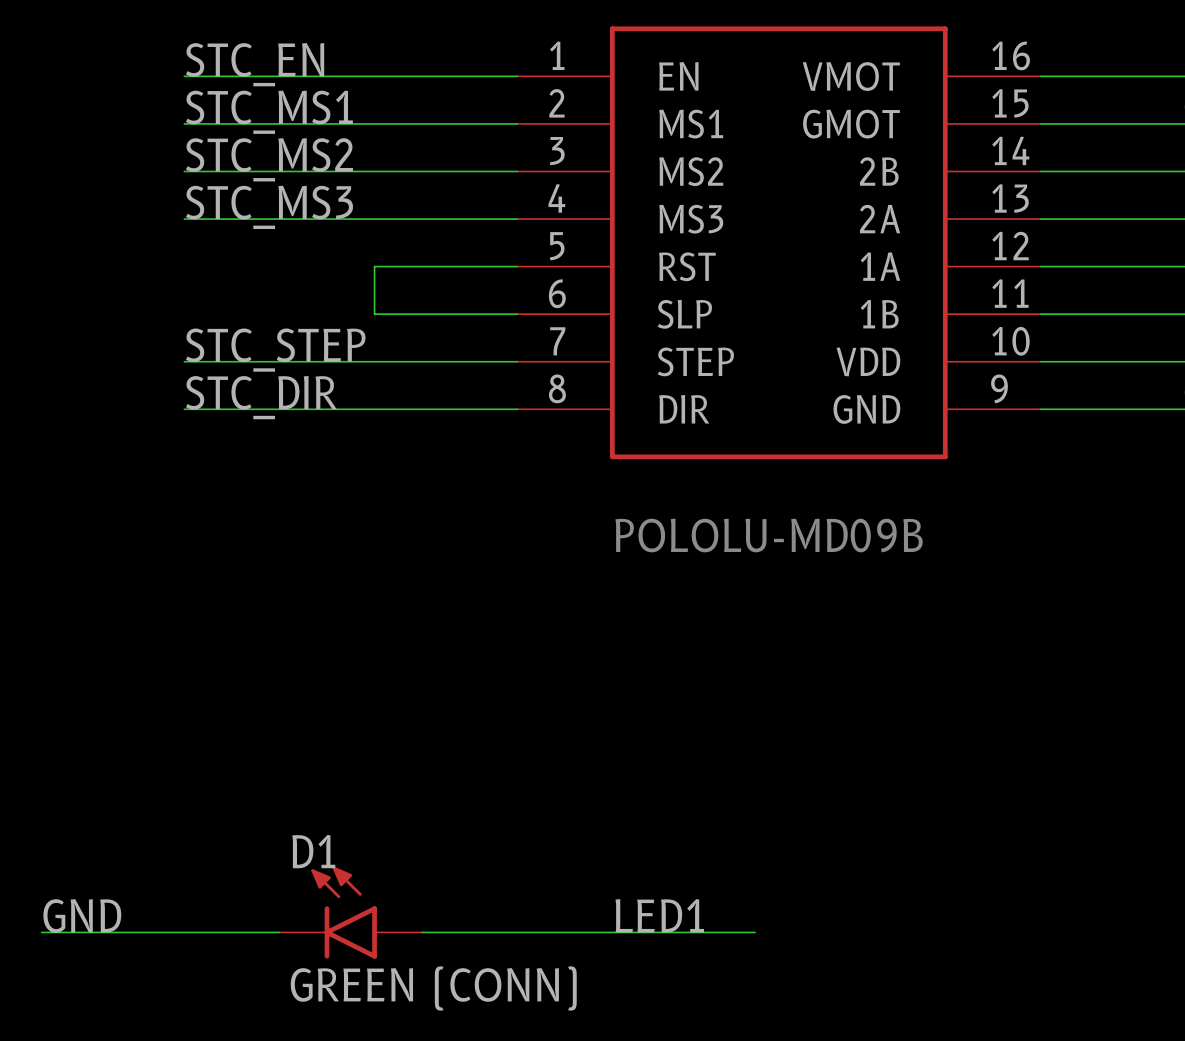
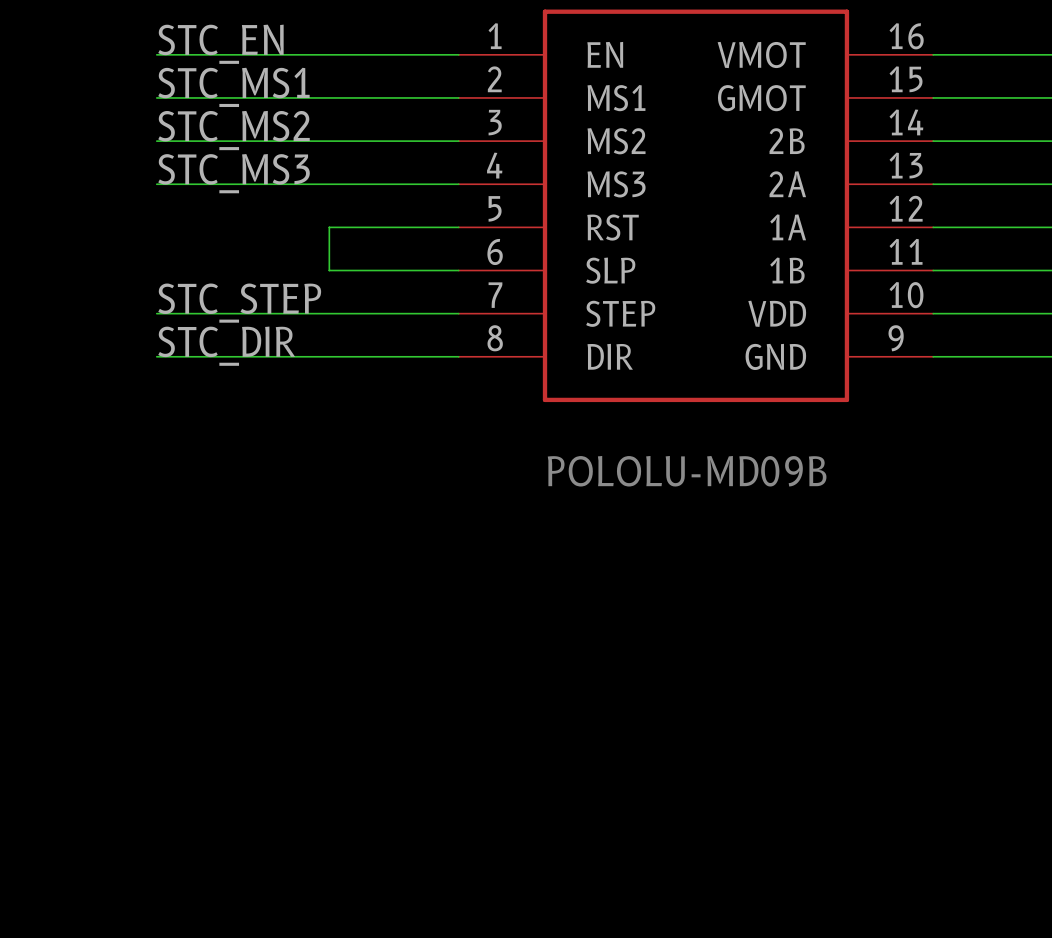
D1: GREEN (CONN) (350, 912) -> none
label: GND (82, 915) -> none
label: LED1 (659, 915) -> none
wire: (41, 932) (279, 932) -> none
wire: (422, 932) (755, 932) -> none

